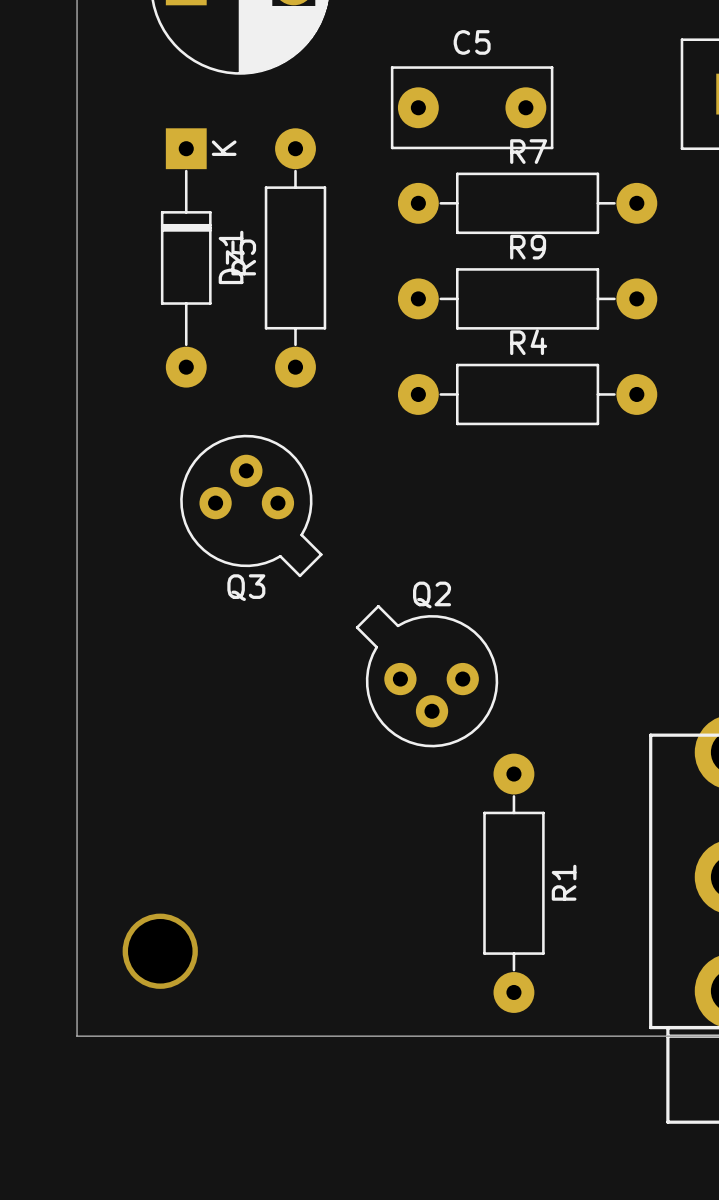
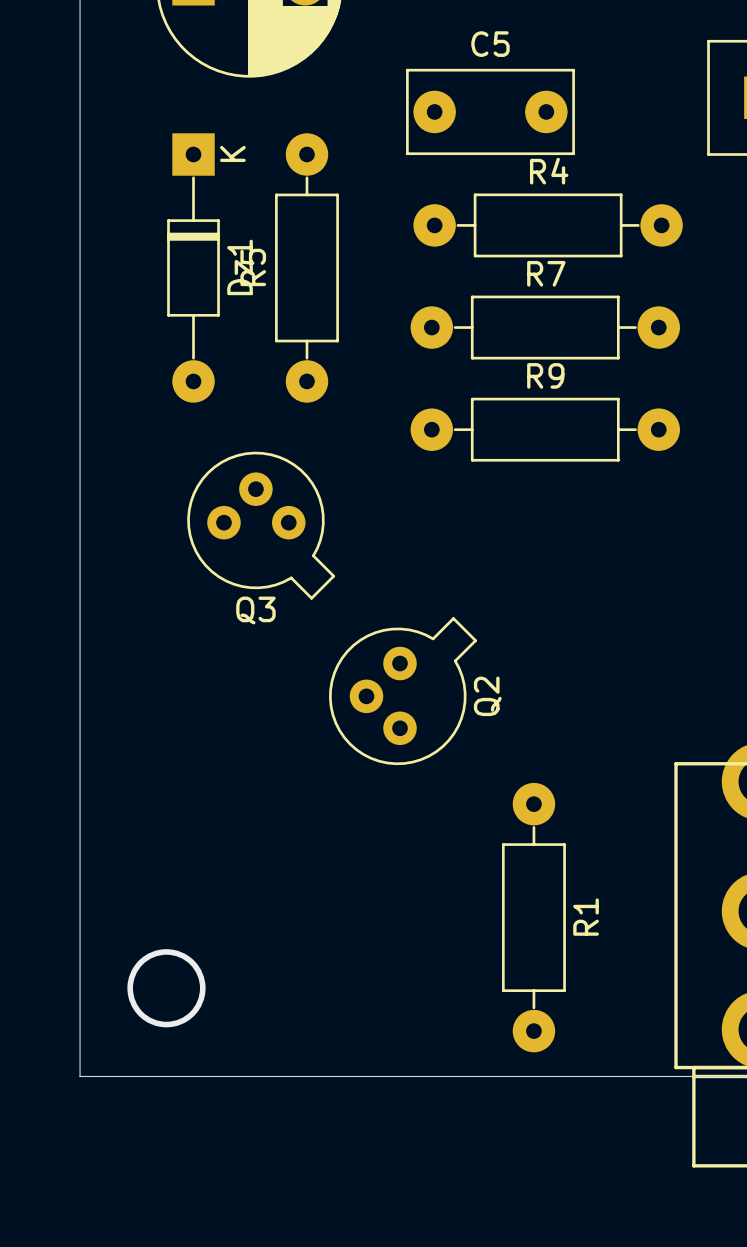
R7 position: (527, 203) -> (545, 327)
R9 position: (527, 298) -> (545, 429)
R4 position: (527, 394) -> (548, 225)
Q2 rotation: 0° (427, 676) -> 90° clockwise (402, 691)

